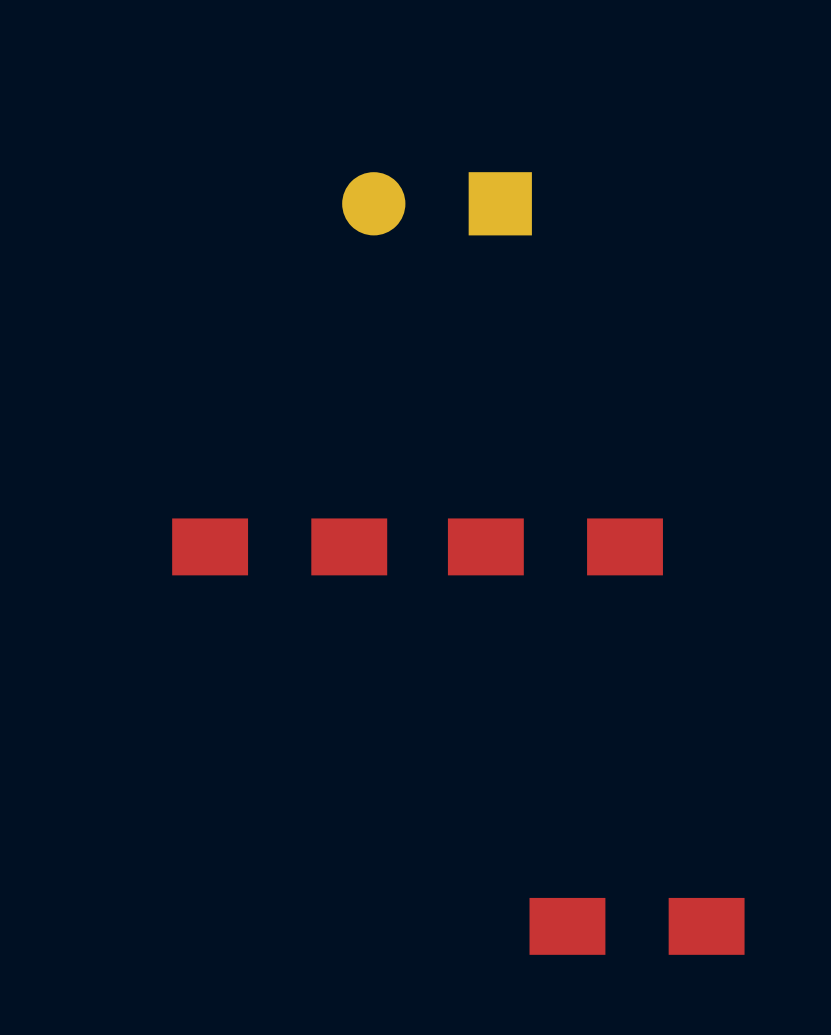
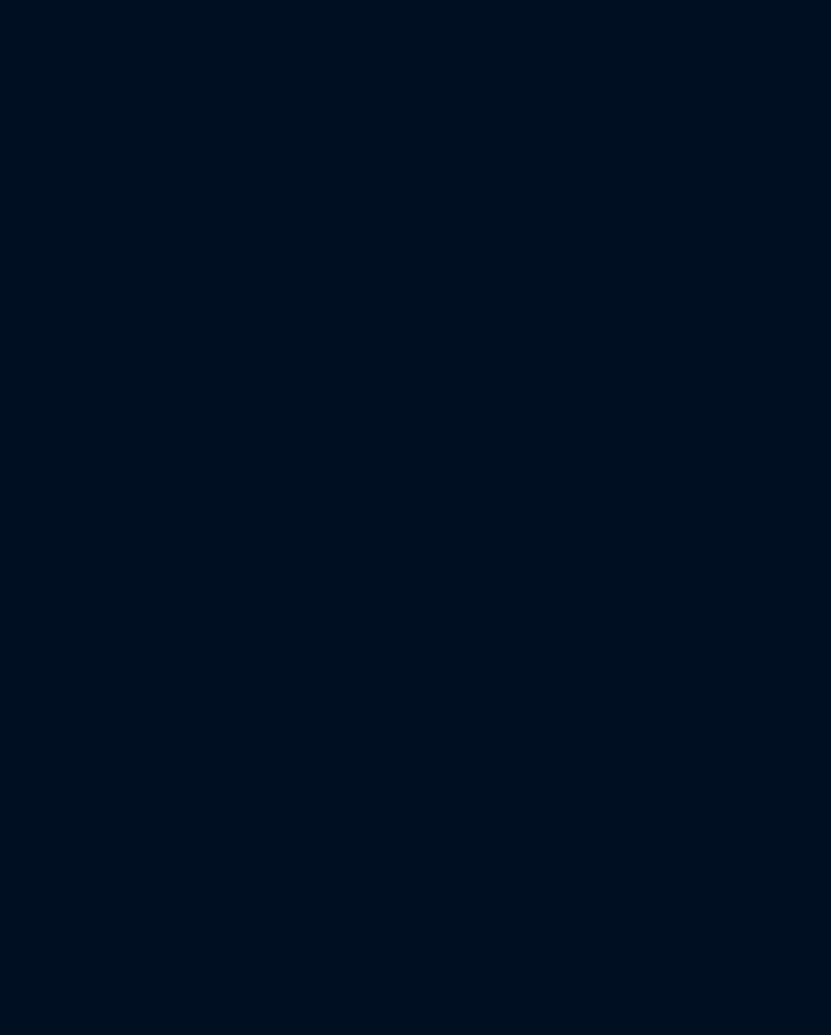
part: (437, 203) -> none
part: (279, 546) -> none
part: (555, 546) -> none
part: (637, 926) -> none

